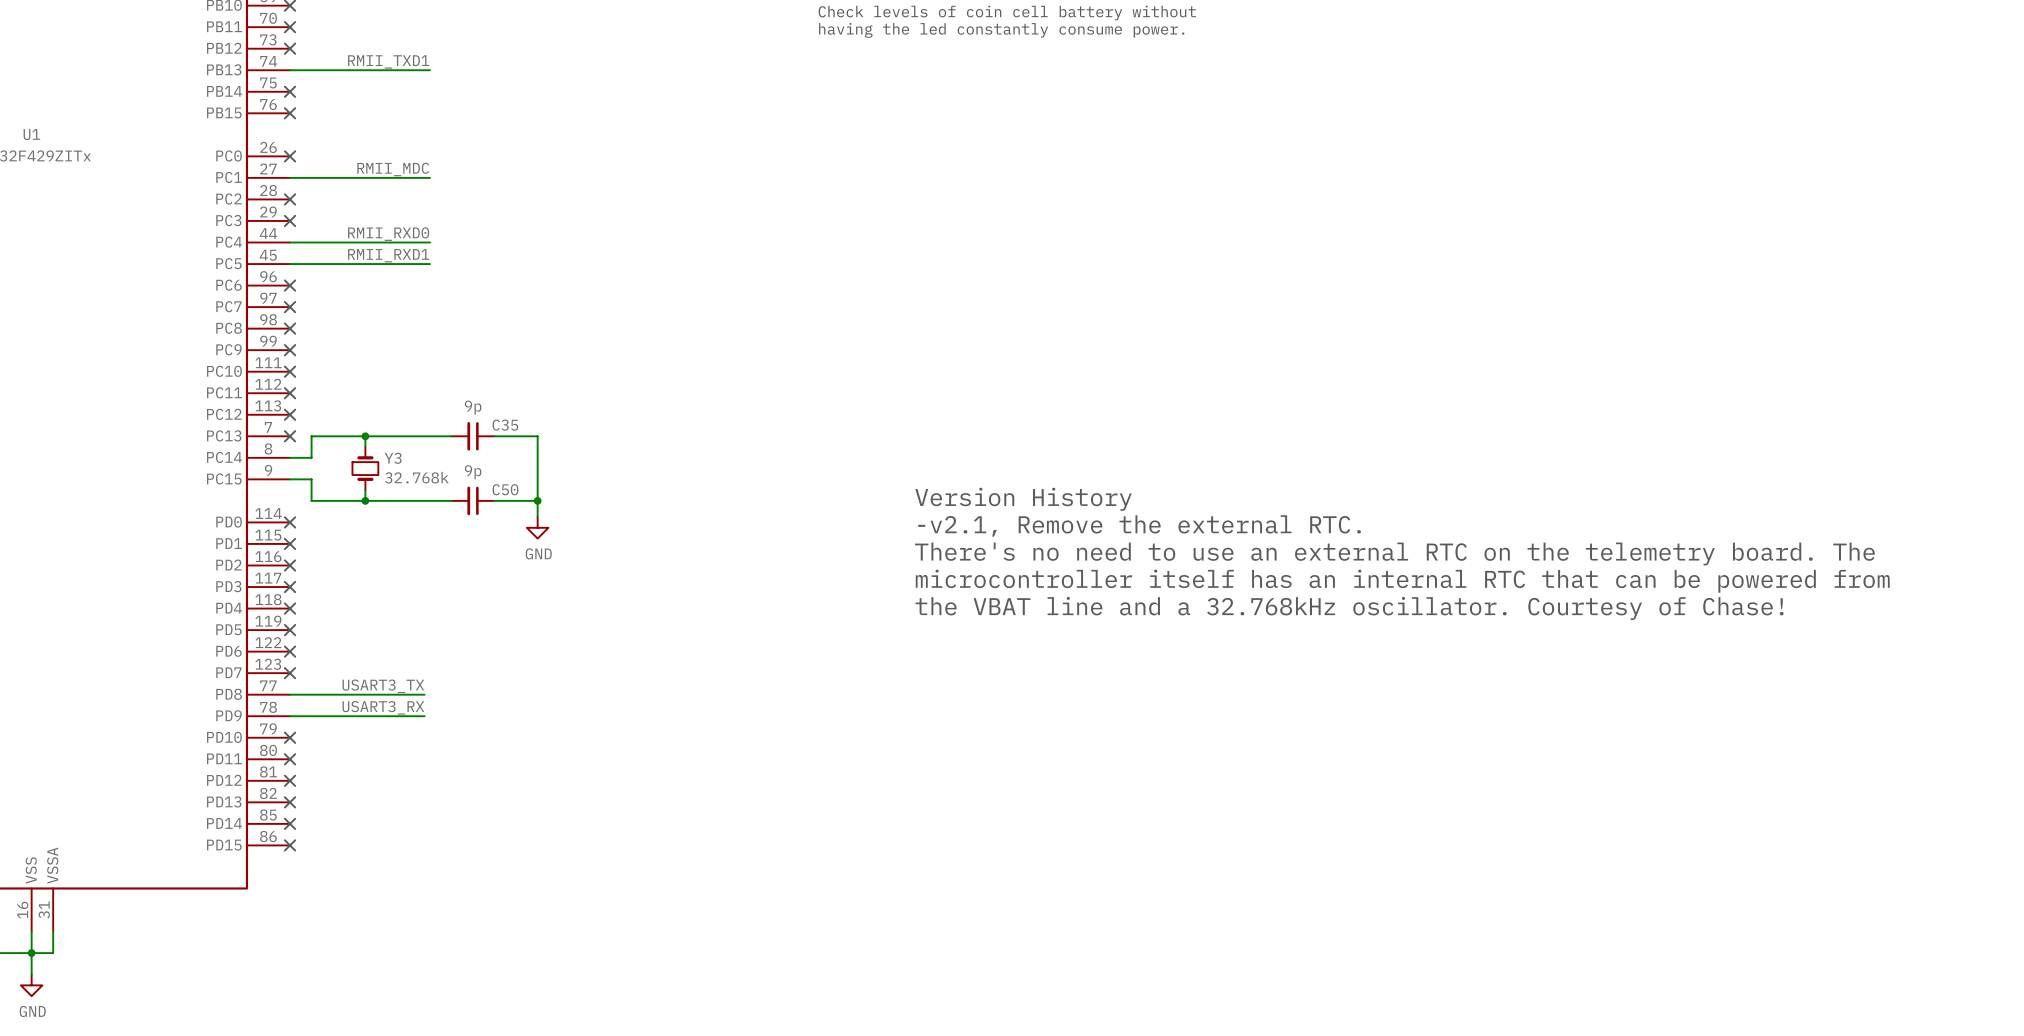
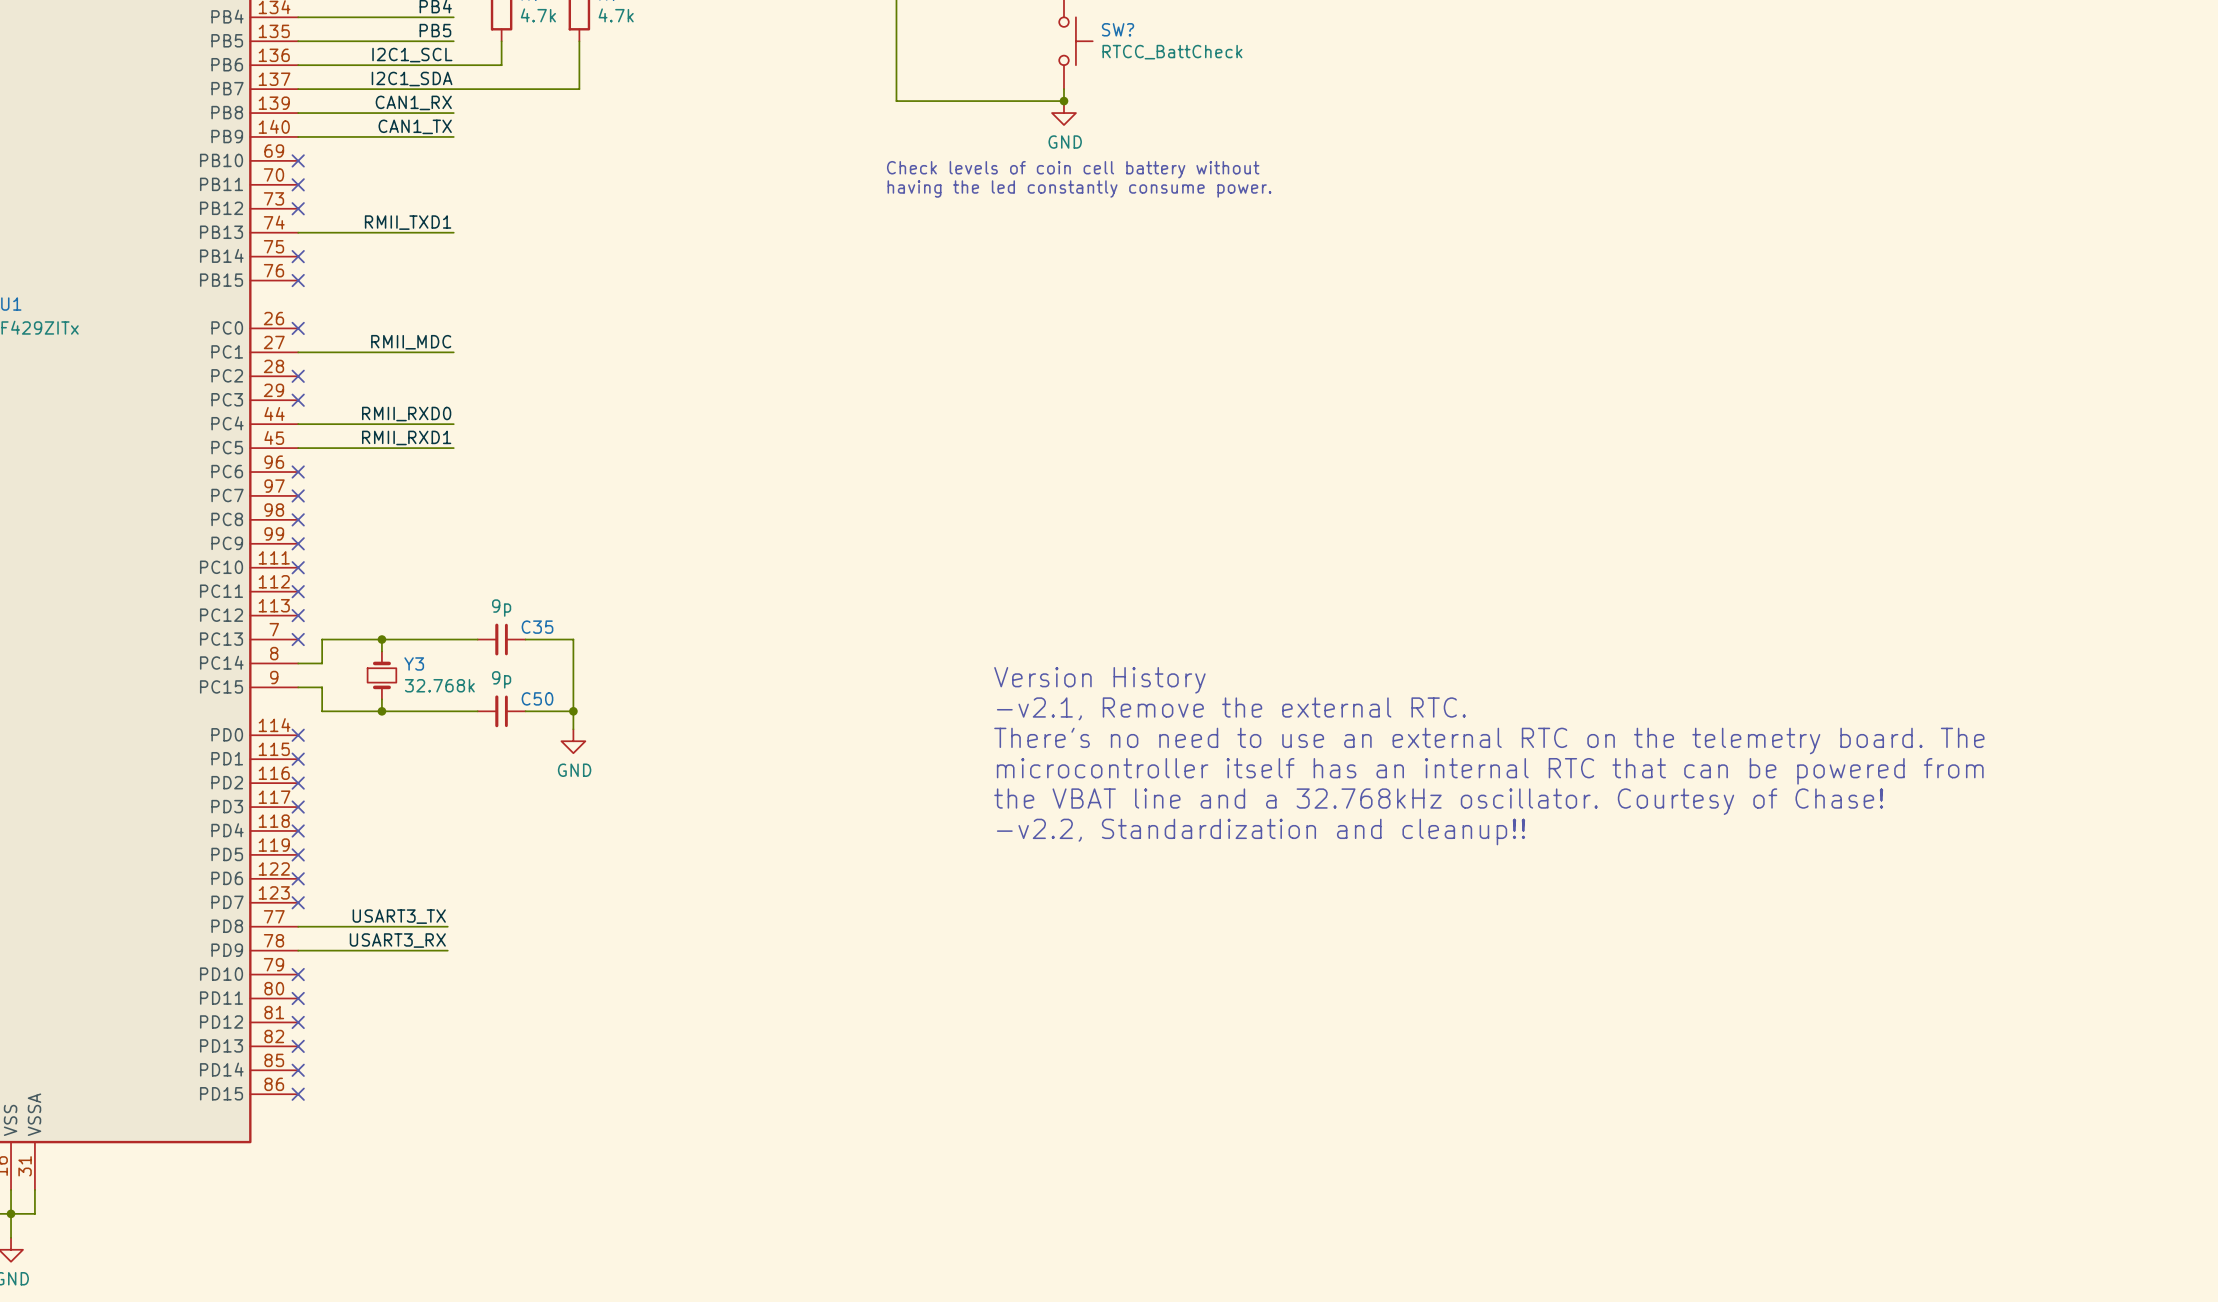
text: none -> Version History (1099, 680)
text: Version History (1023, 499) -> -v2.1, Remove the external RTC. (1231, 708)
text: -v2.1, Remove the external RTC. (1139, 525) -> There's no need to use an external RTC on the telemetry board. The (1489, 740)
text: There's no need to use an external RTC on the telemetry board. The (1394, 553) -> microcontroller itself has an internal RTC that can be powered from (1490, 771)
text: microcontroller itself has an internal RTC that can be powered from (1402, 581) -> the VBAT line and a 32.768kHz oscillator. Courtesy of Chase! (1438, 801)
text: the VBAT line and a 32.768kHz oscillator. Courtesy of Chase! (1349, 608) -> -v2.2, Standardization and cleanup!! (1260, 832)

